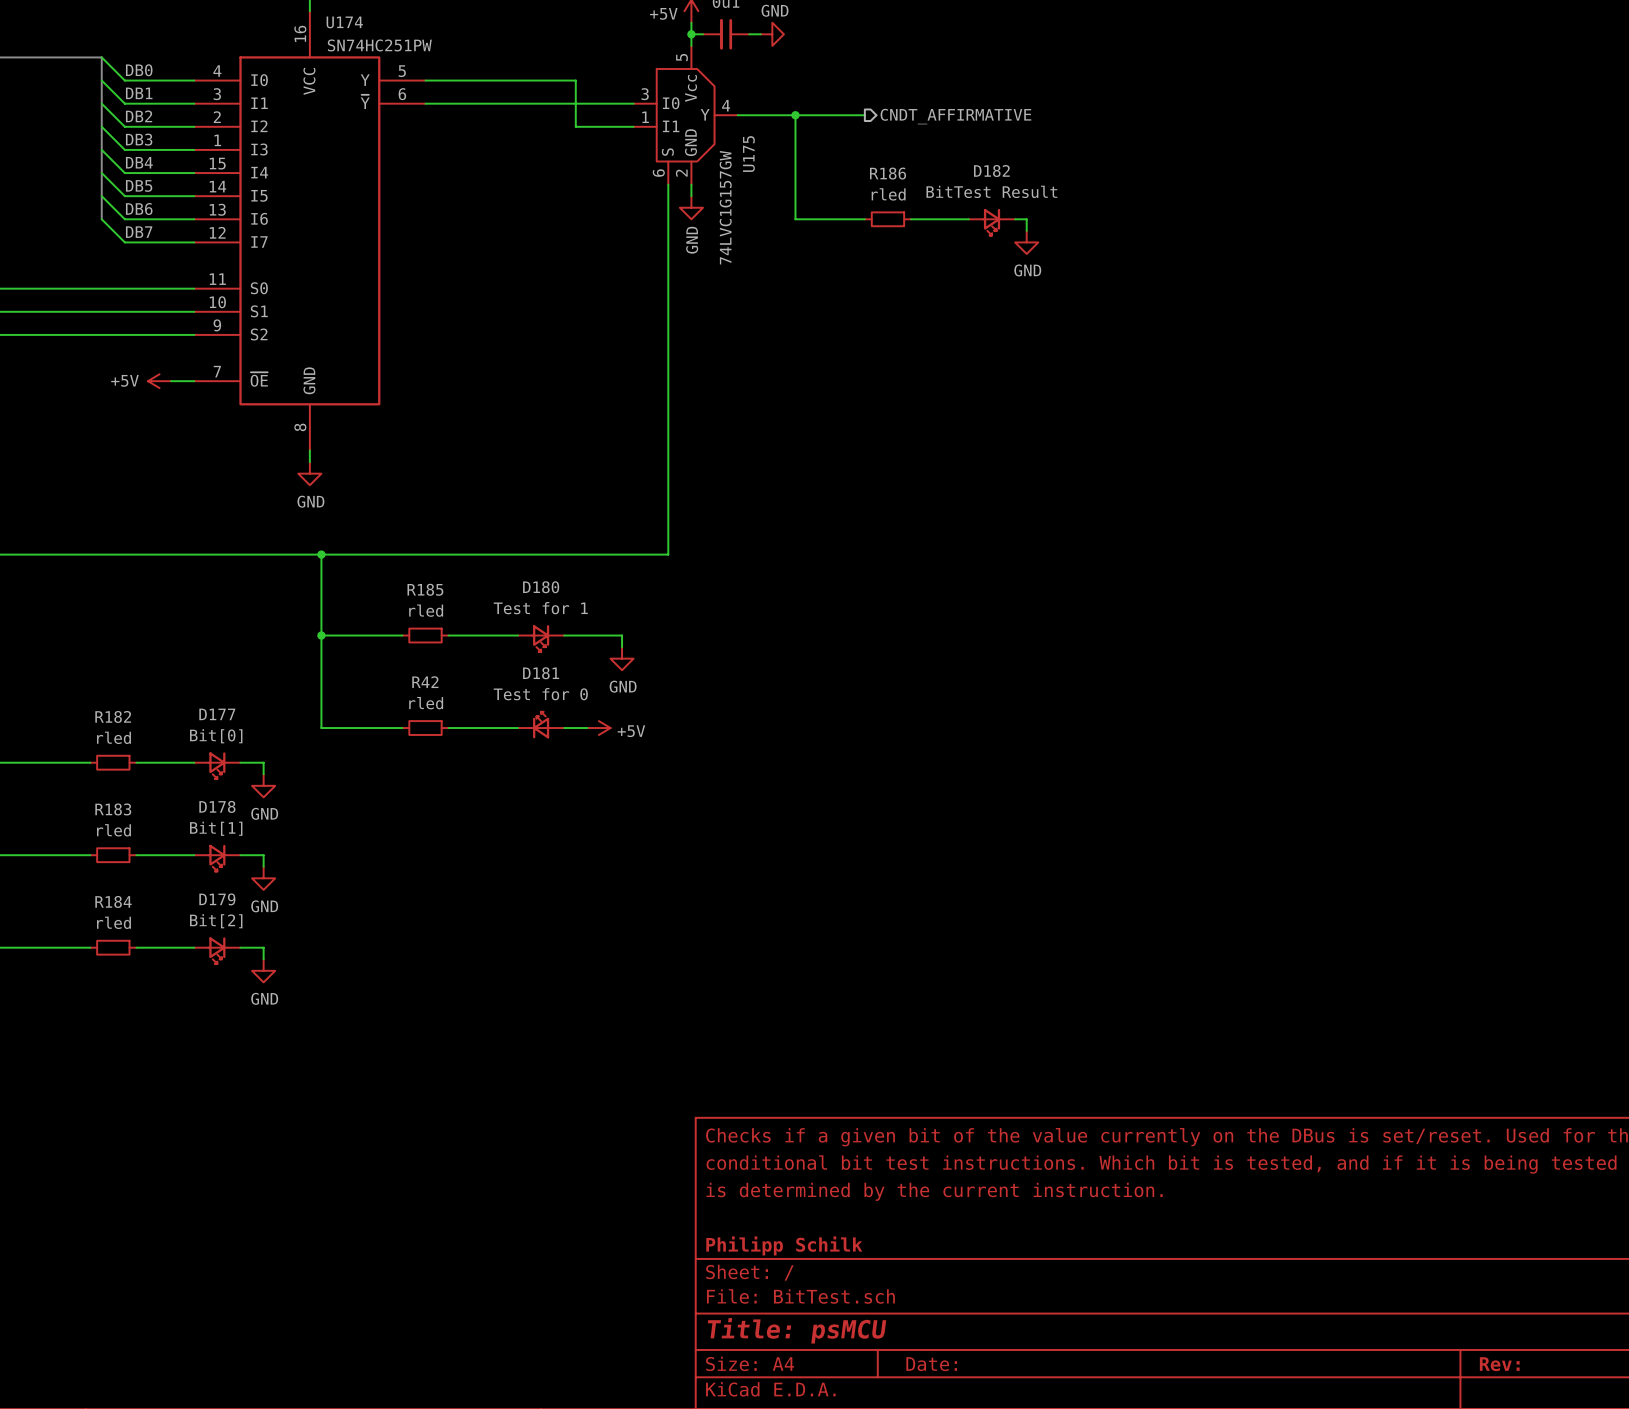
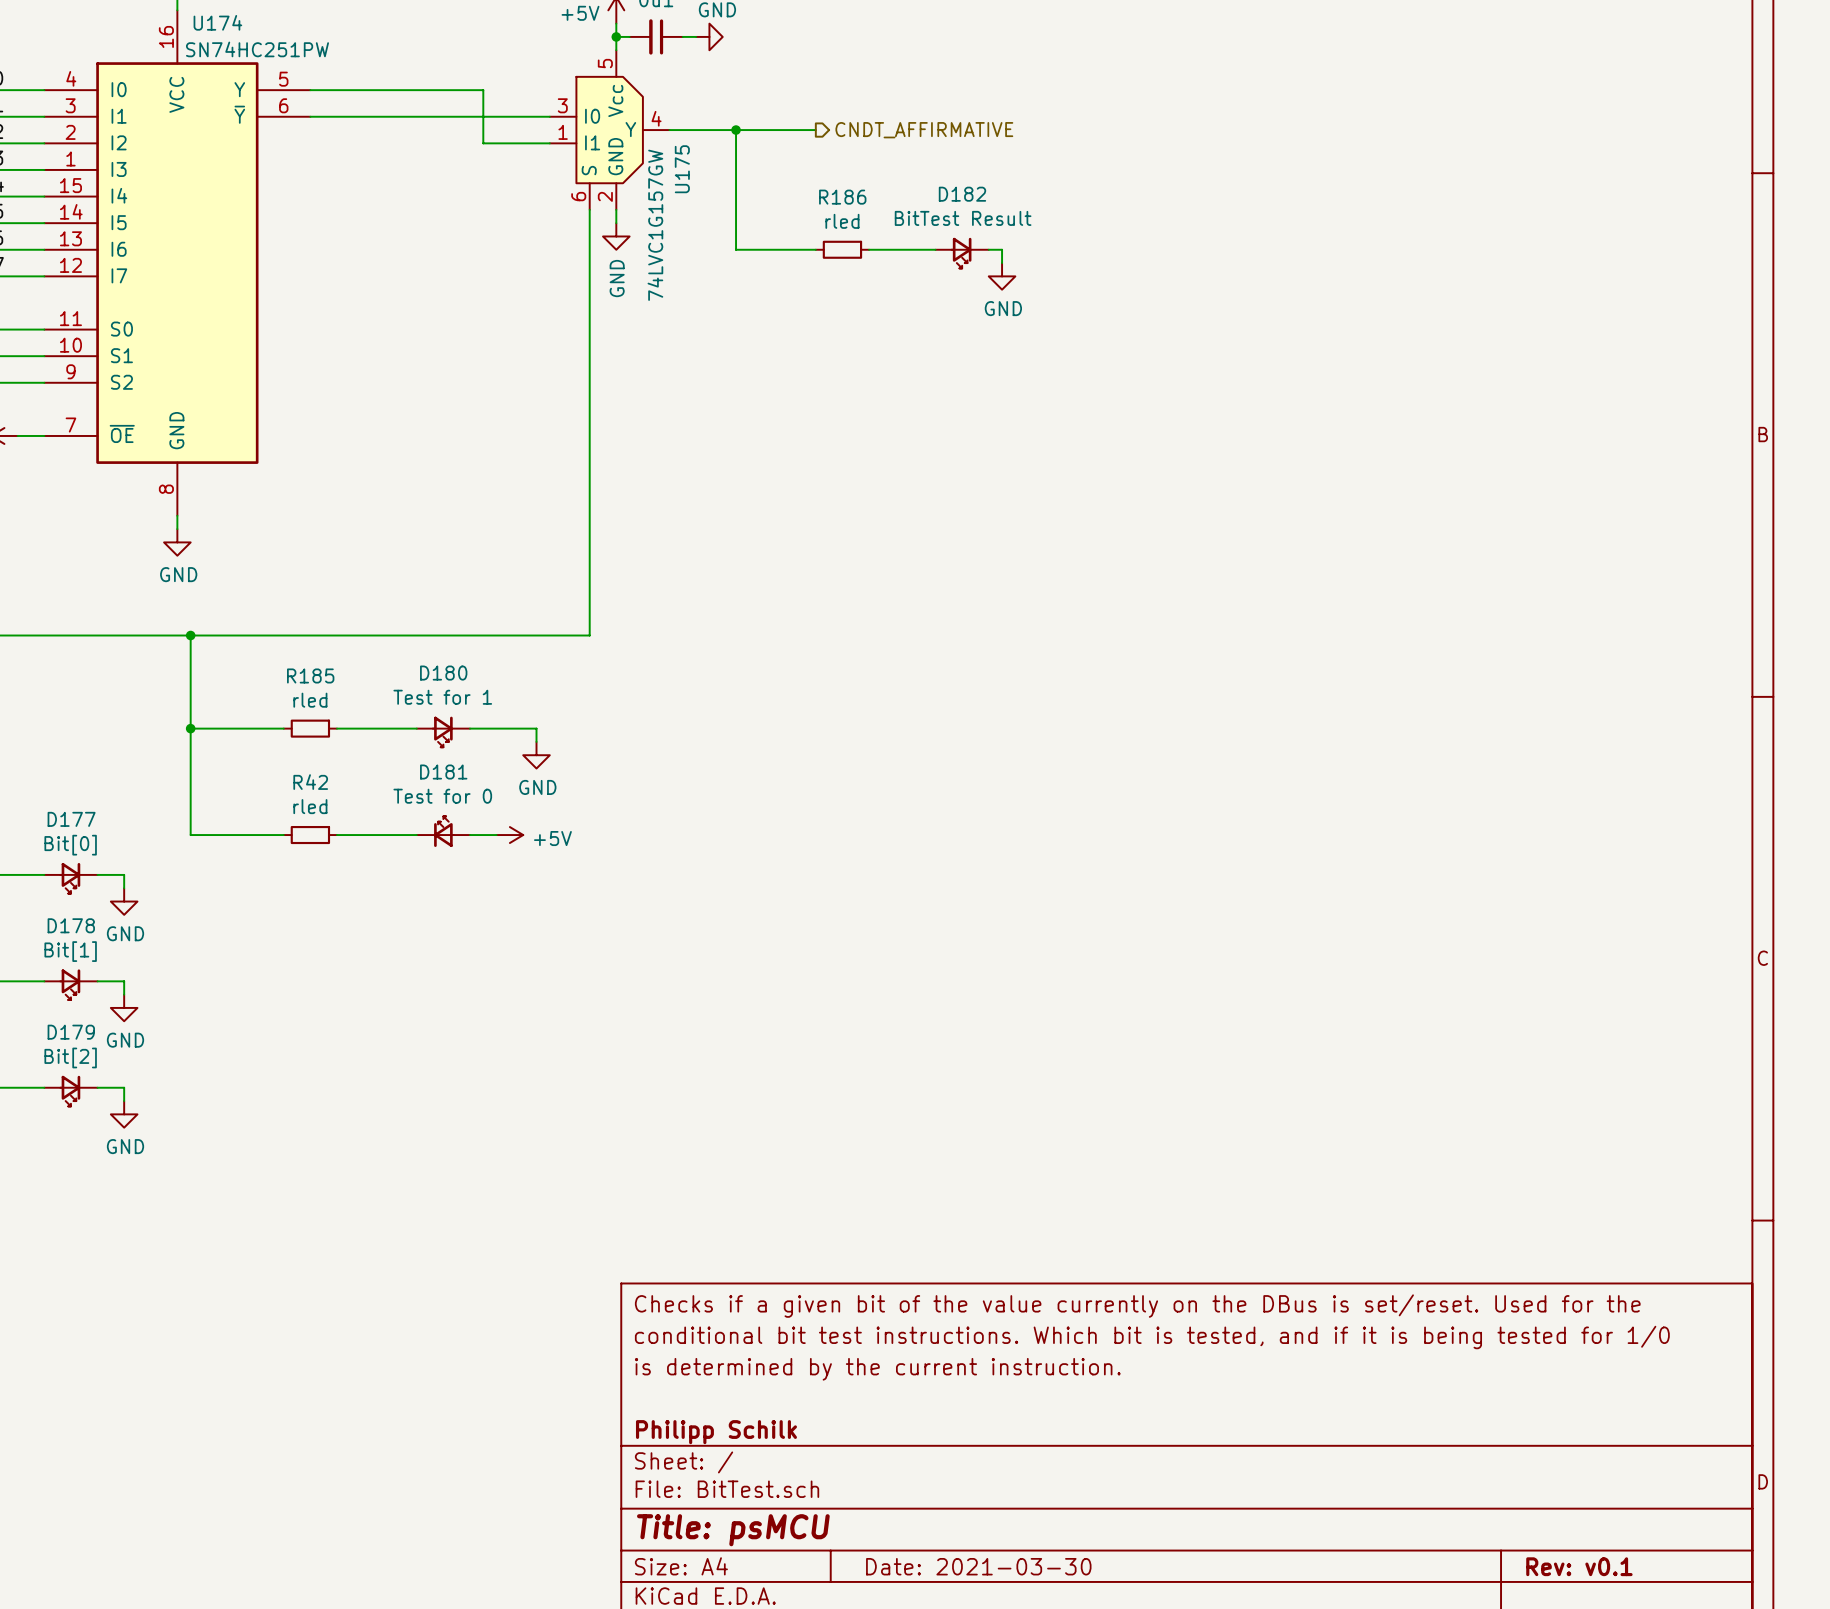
title block: Date: (931, 1364) -> Date: 2021-03-30 (978, 1566)
title block: Rev: (1499, 1364) -> Rev: v0.1 (1579, 1566)

